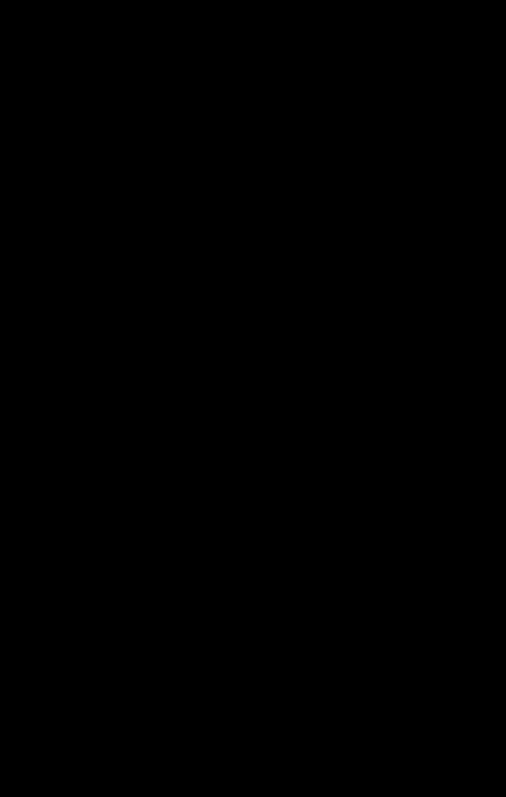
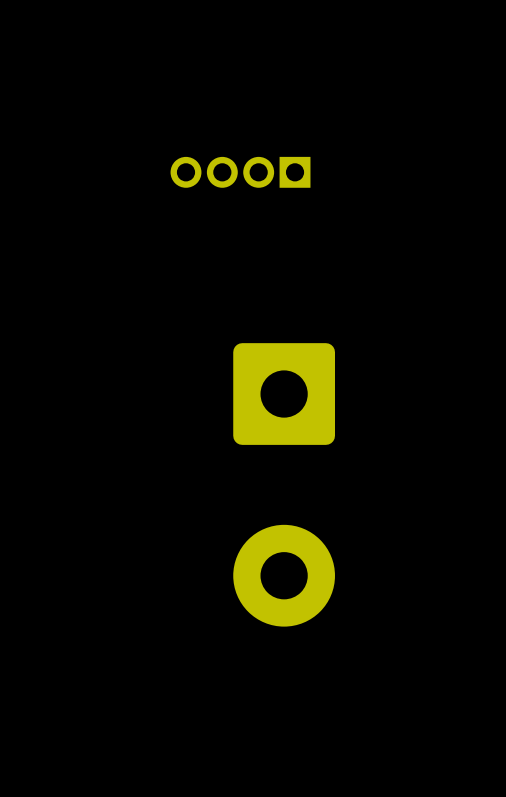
part: none -> (240, 172)
part: none -> (284, 484)

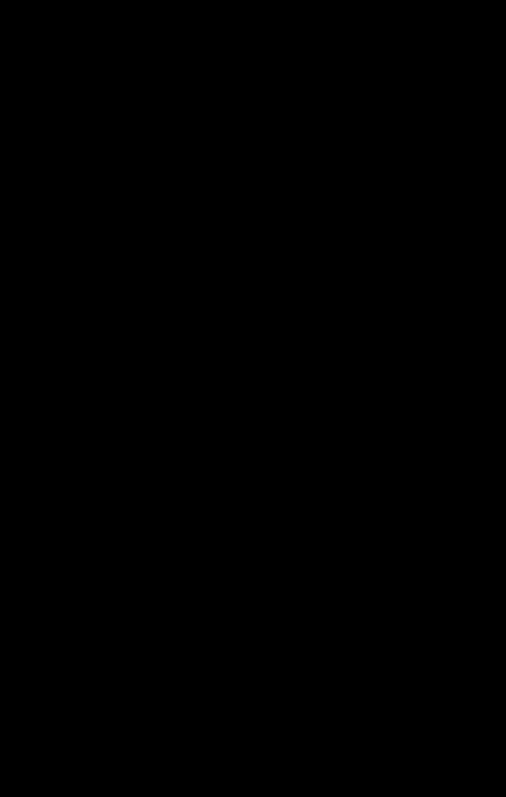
part: (240, 172) -> none
part: (284, 484) -> none

